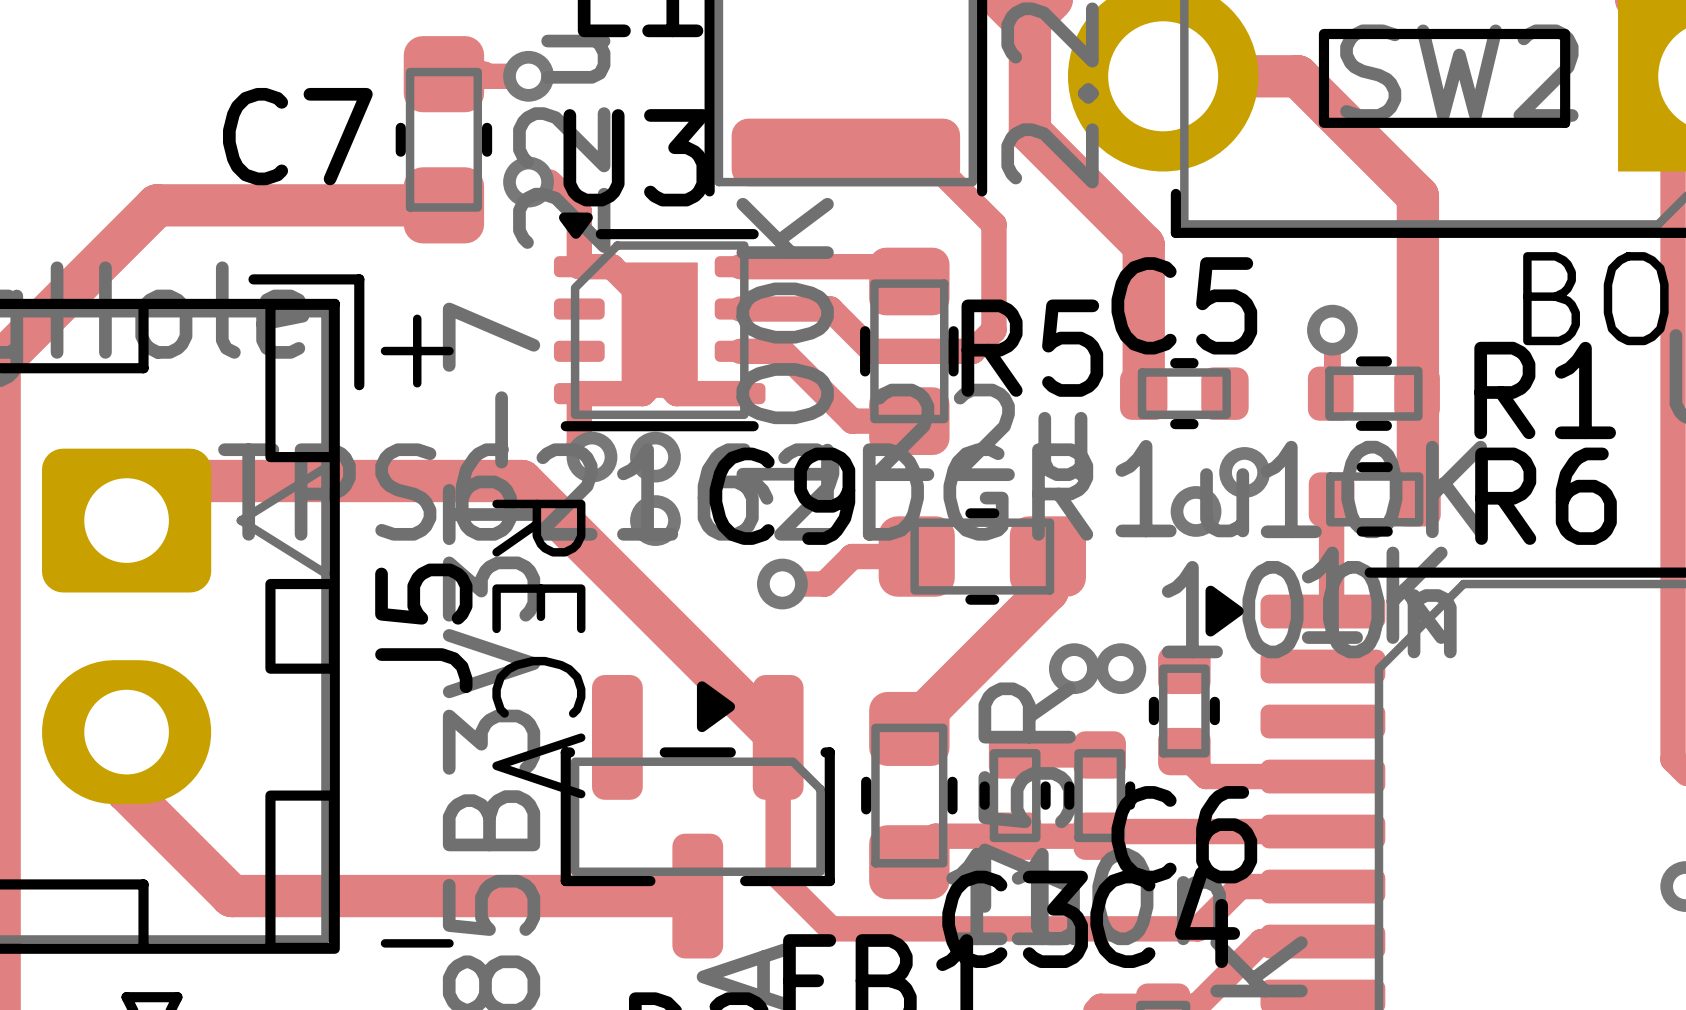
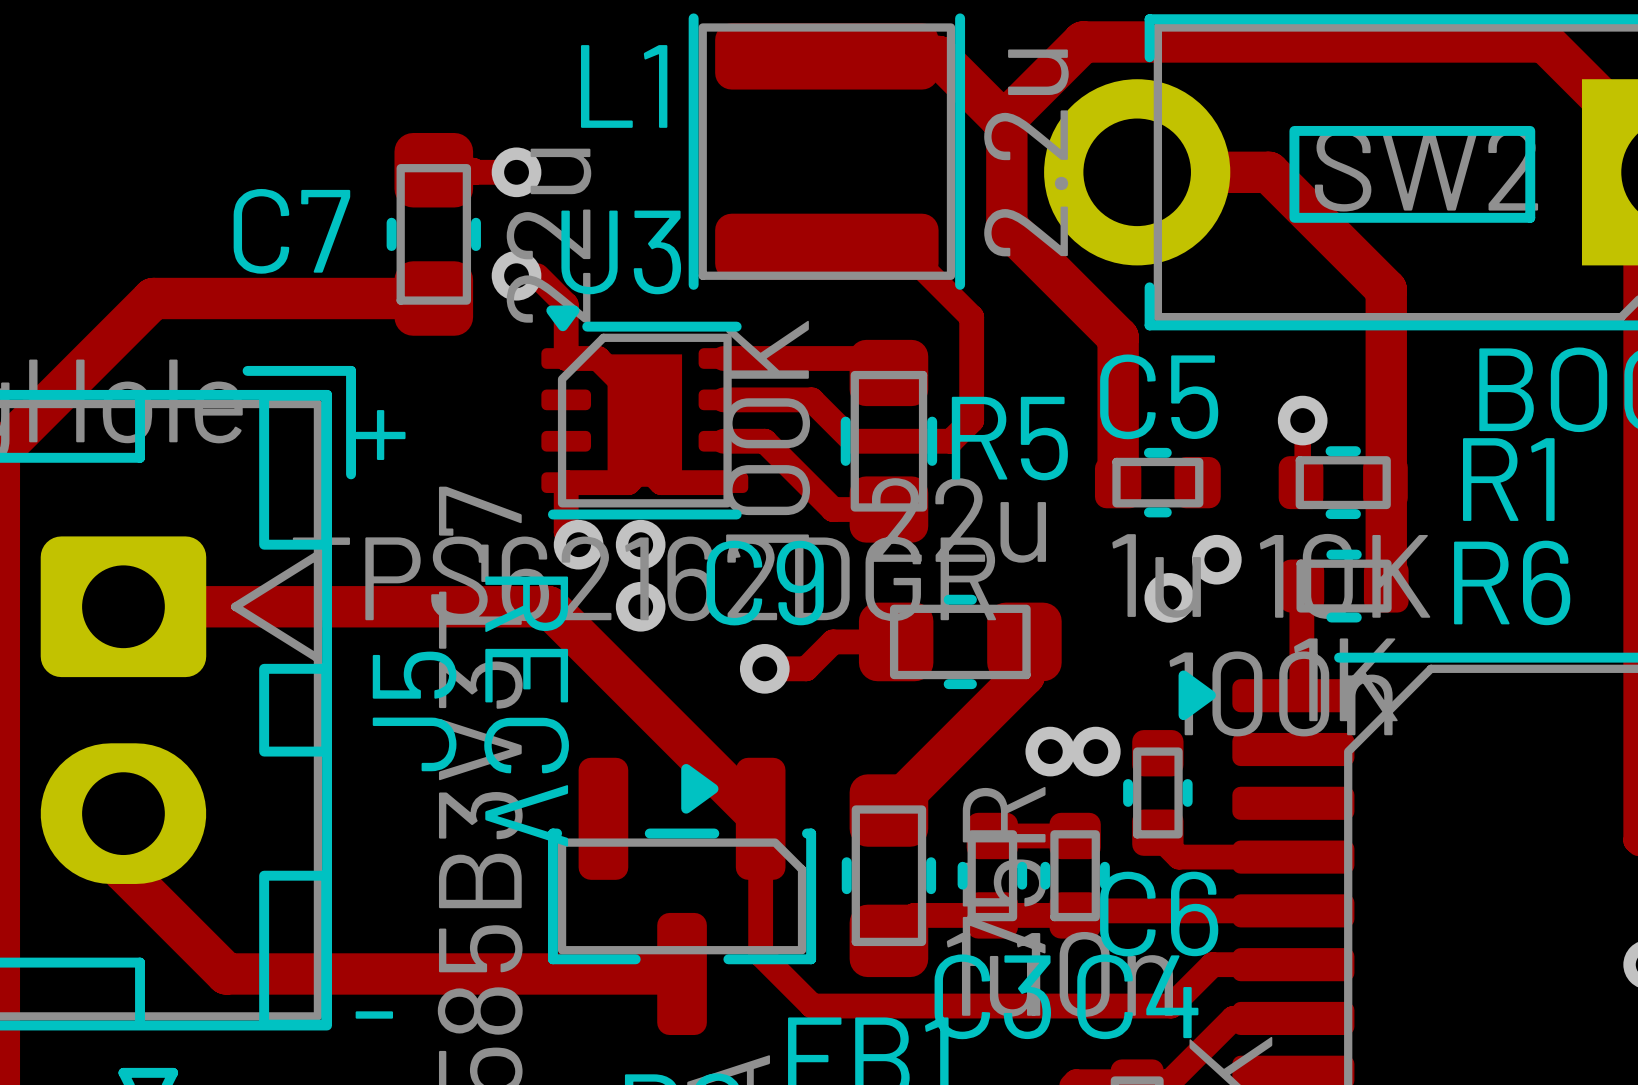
top track: (151, 481) (521, 481) (561, 520) -> (123, 606) (548, 606)

